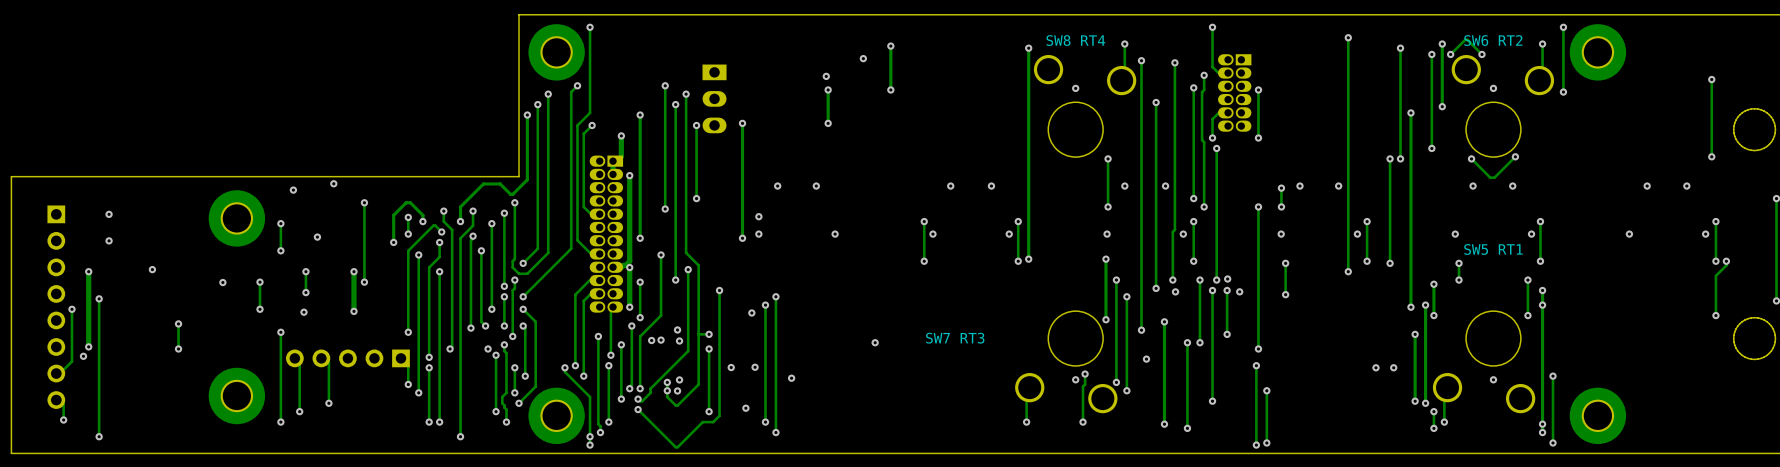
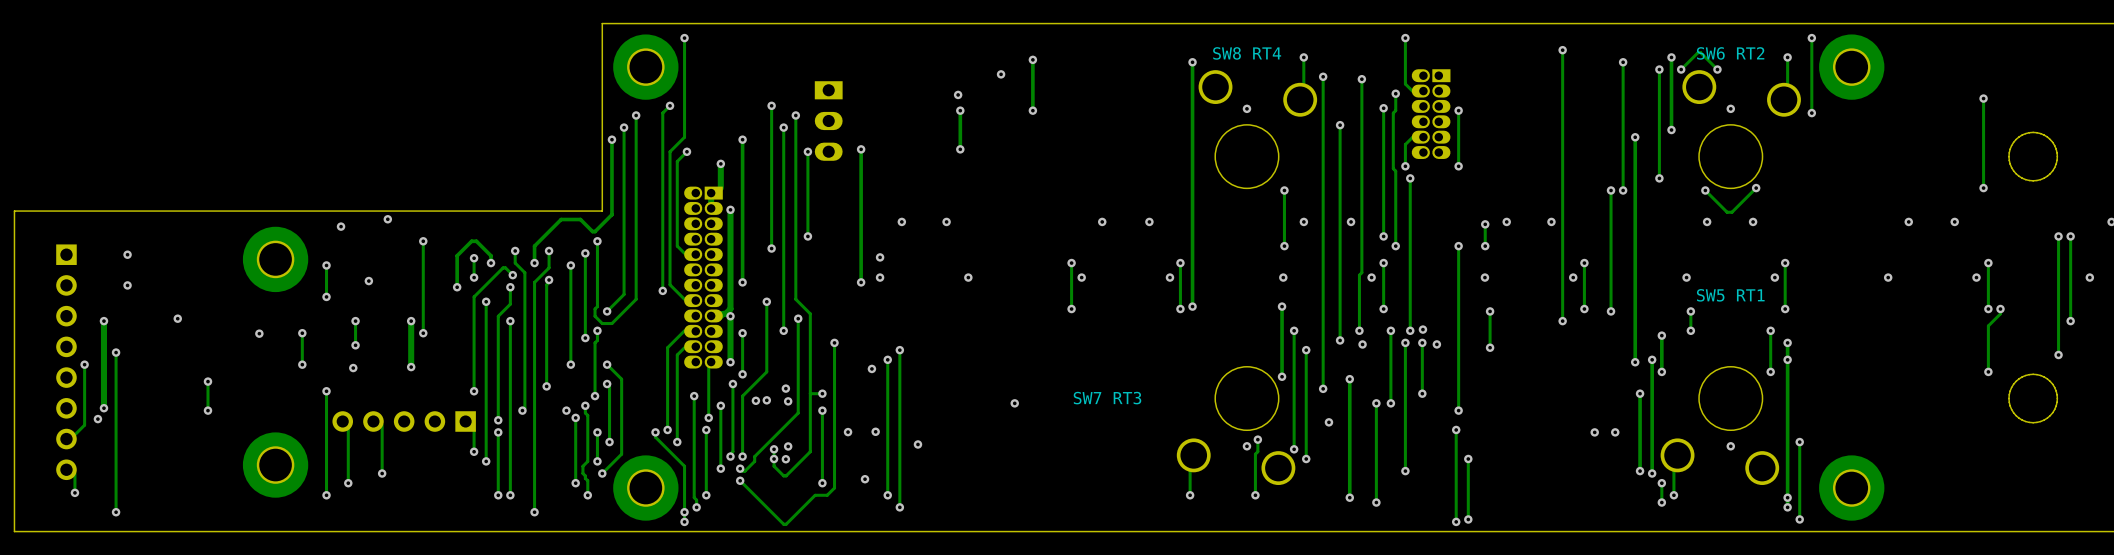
track: (571, 245) (571, 248) (523, 296) -> none
via: none -> (662, 290)
track: (481, 250) (481, 321) (485, 326) -> none
via: (481, 250) -> none
track: (504, 296) (504, 326) -> none
via: (504, 296) -> none
via: (523, 296) -> none
via: (485, 326) -> none
via: (504, 326) -> none

